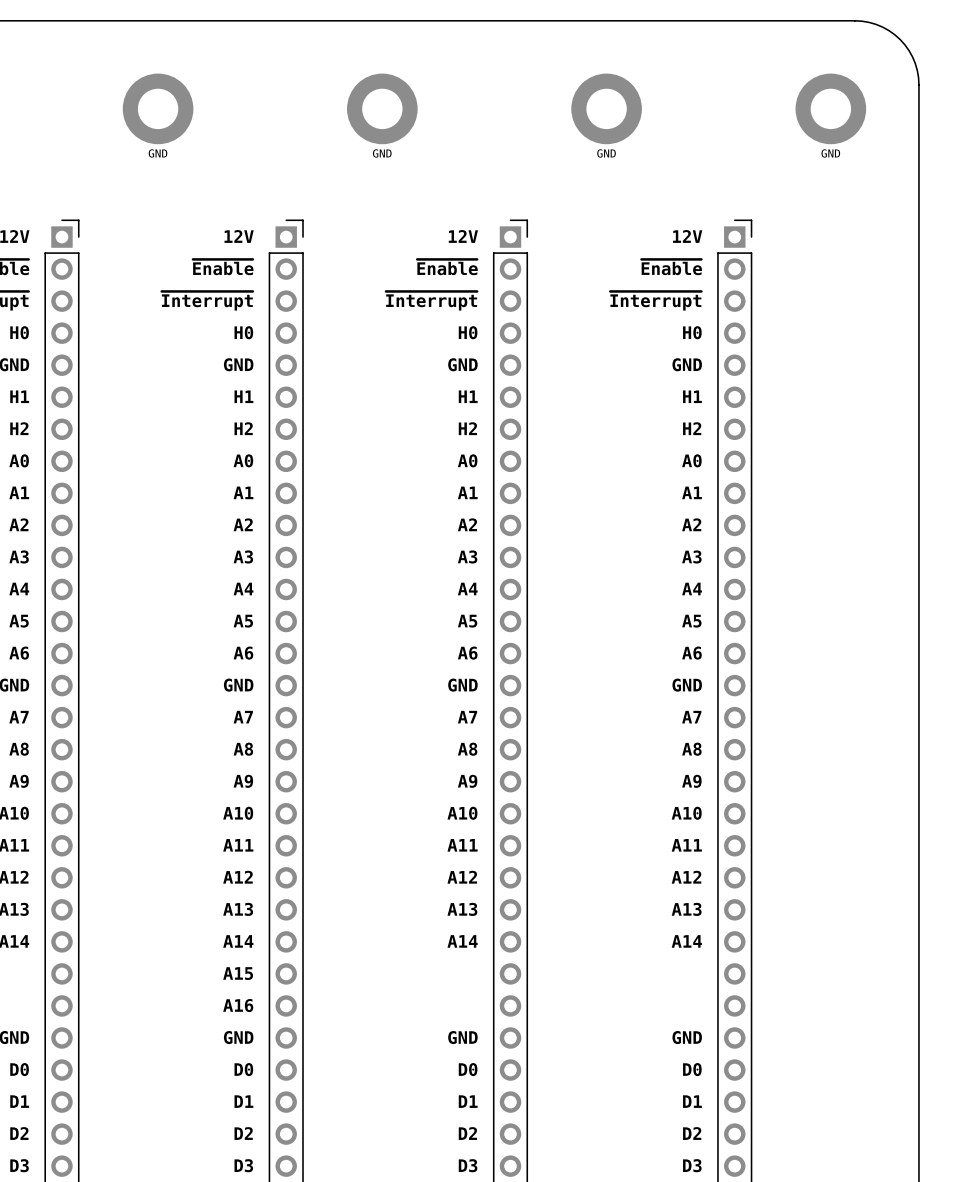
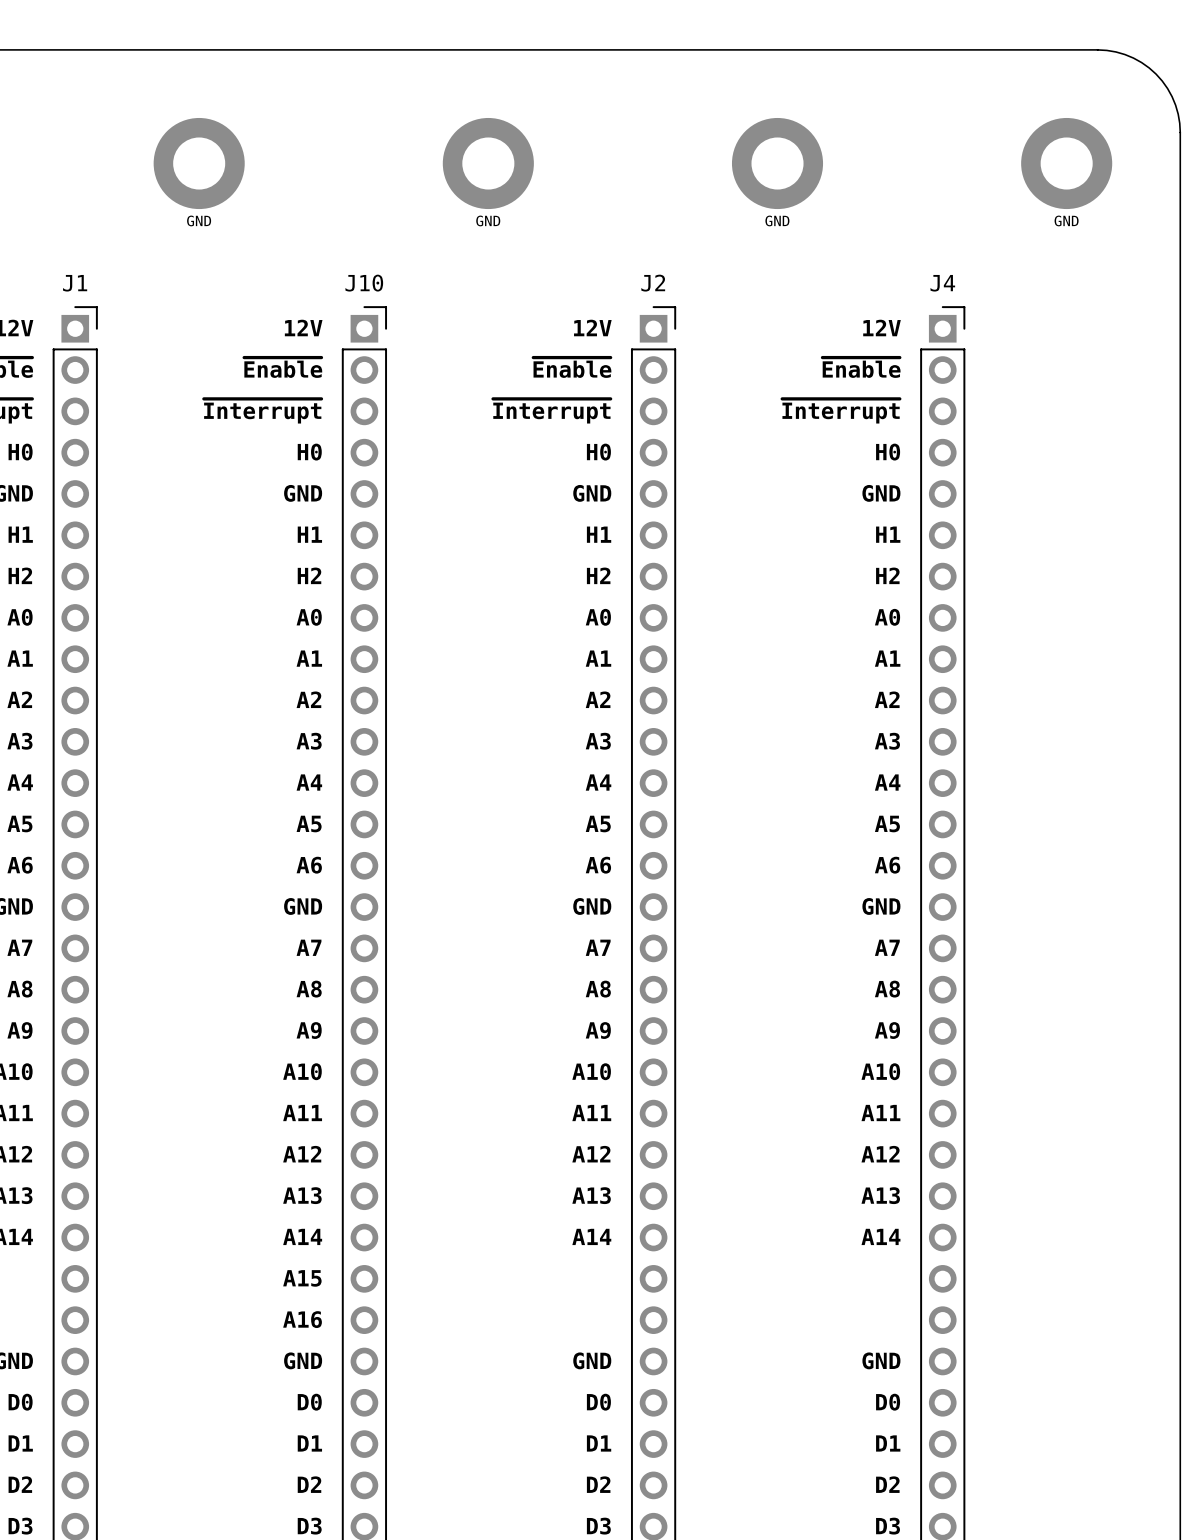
J1 name: none -> J1 (75, 283)
J10 name: none -> J10 (364, 283)
J2 name: none -> J2 (653, 283)
J4 name: none -> J4 (942, 283)

